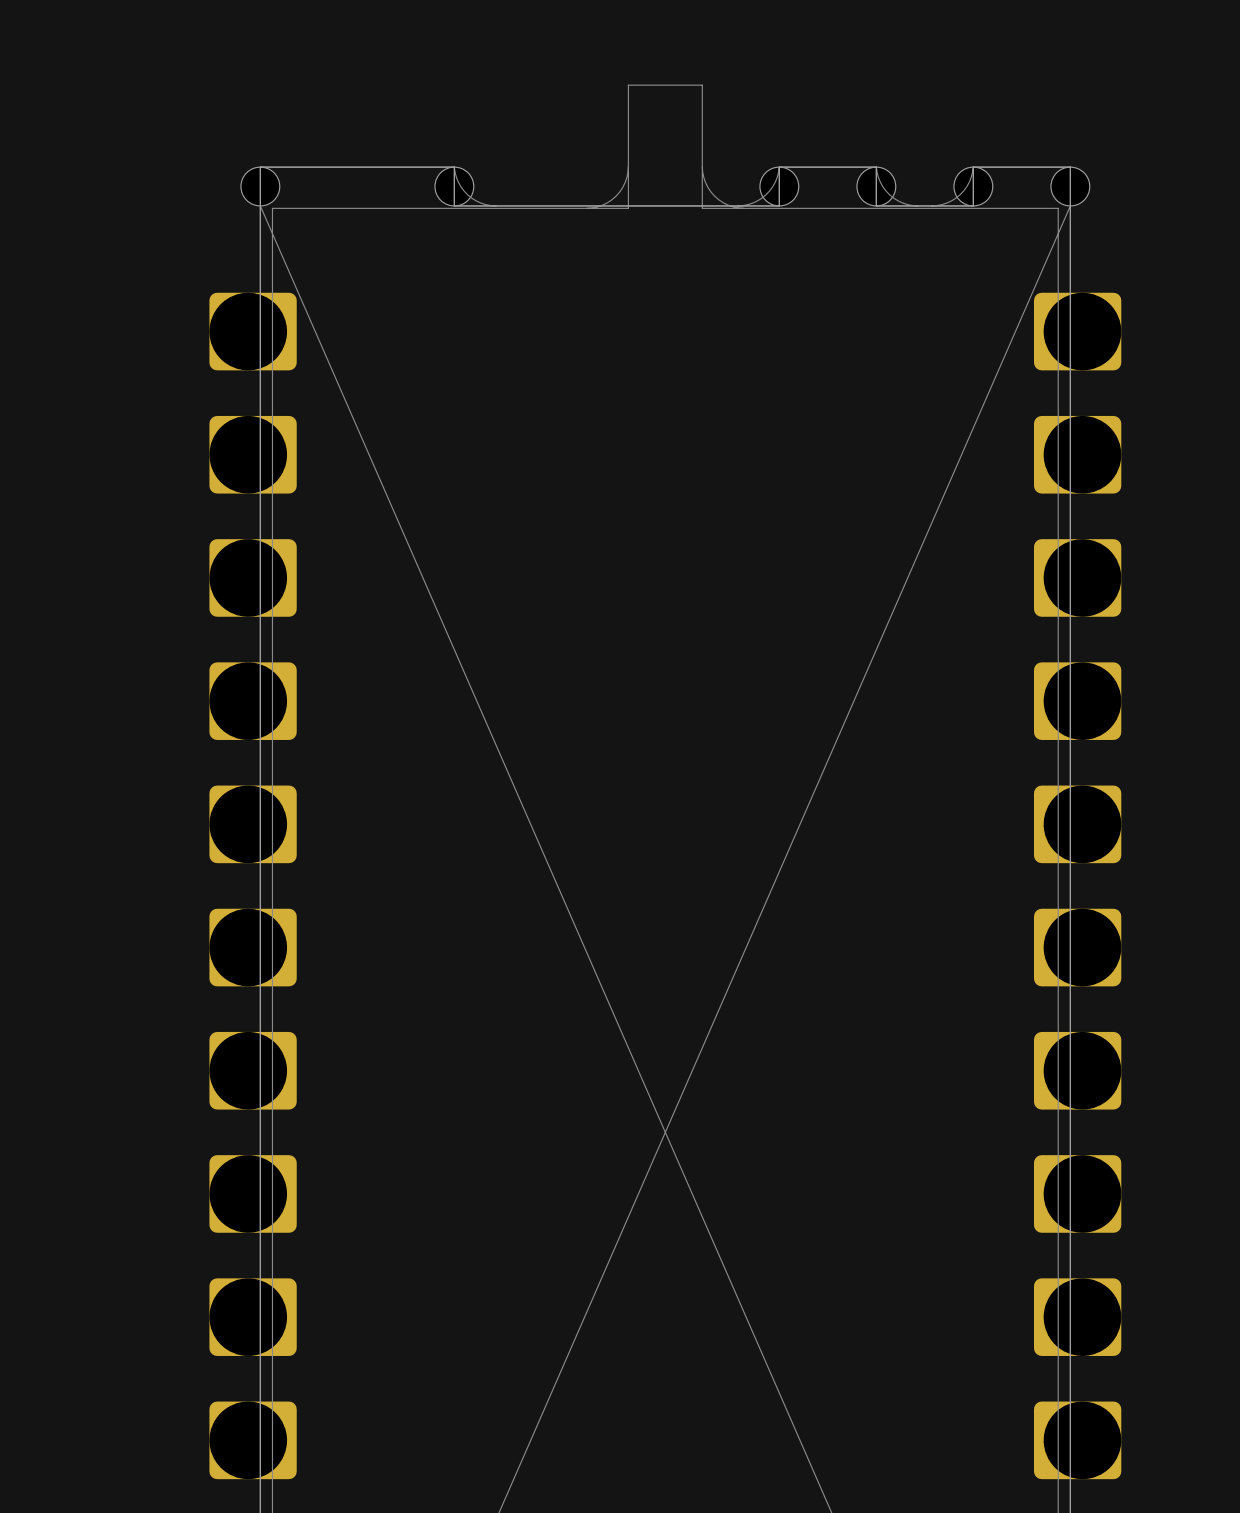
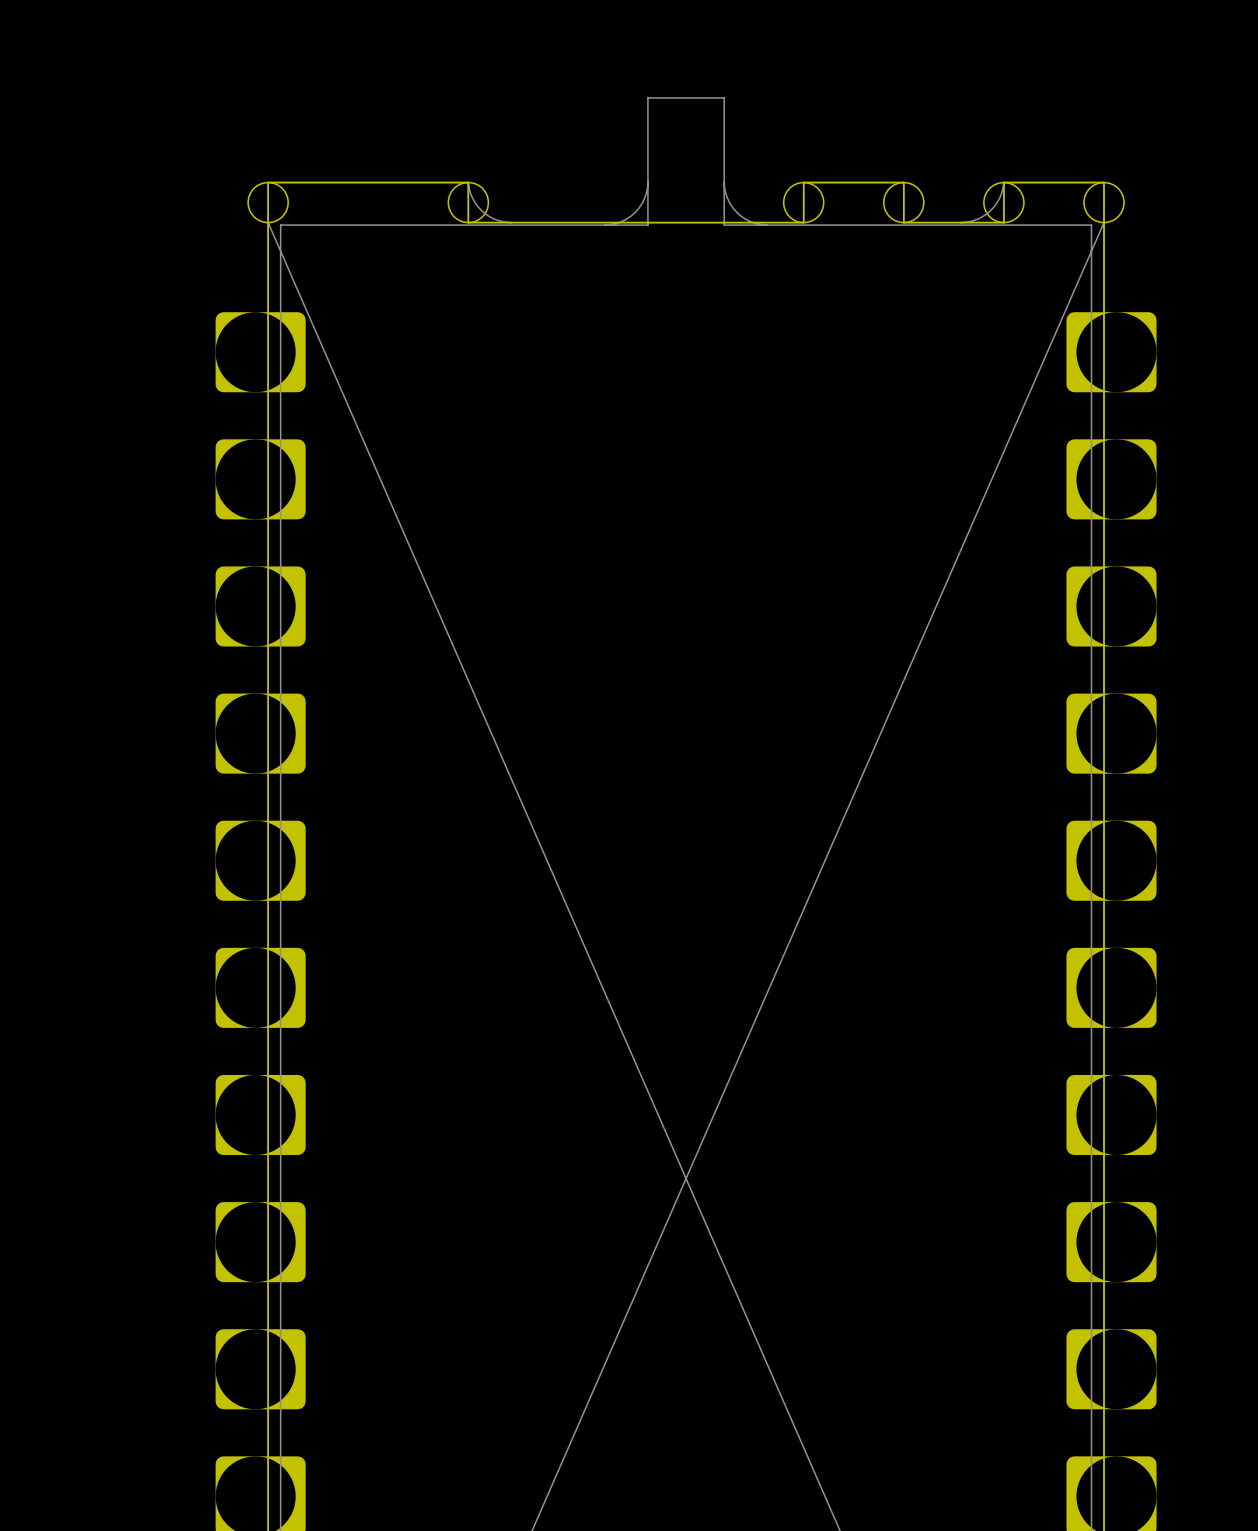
line: (779, 167) (775, 182) (766, 194) (752, 203) (737, 205) -> none
line: (876, 167) (880, 182) (889, 194) (902, 203) (918, 205) -> none

